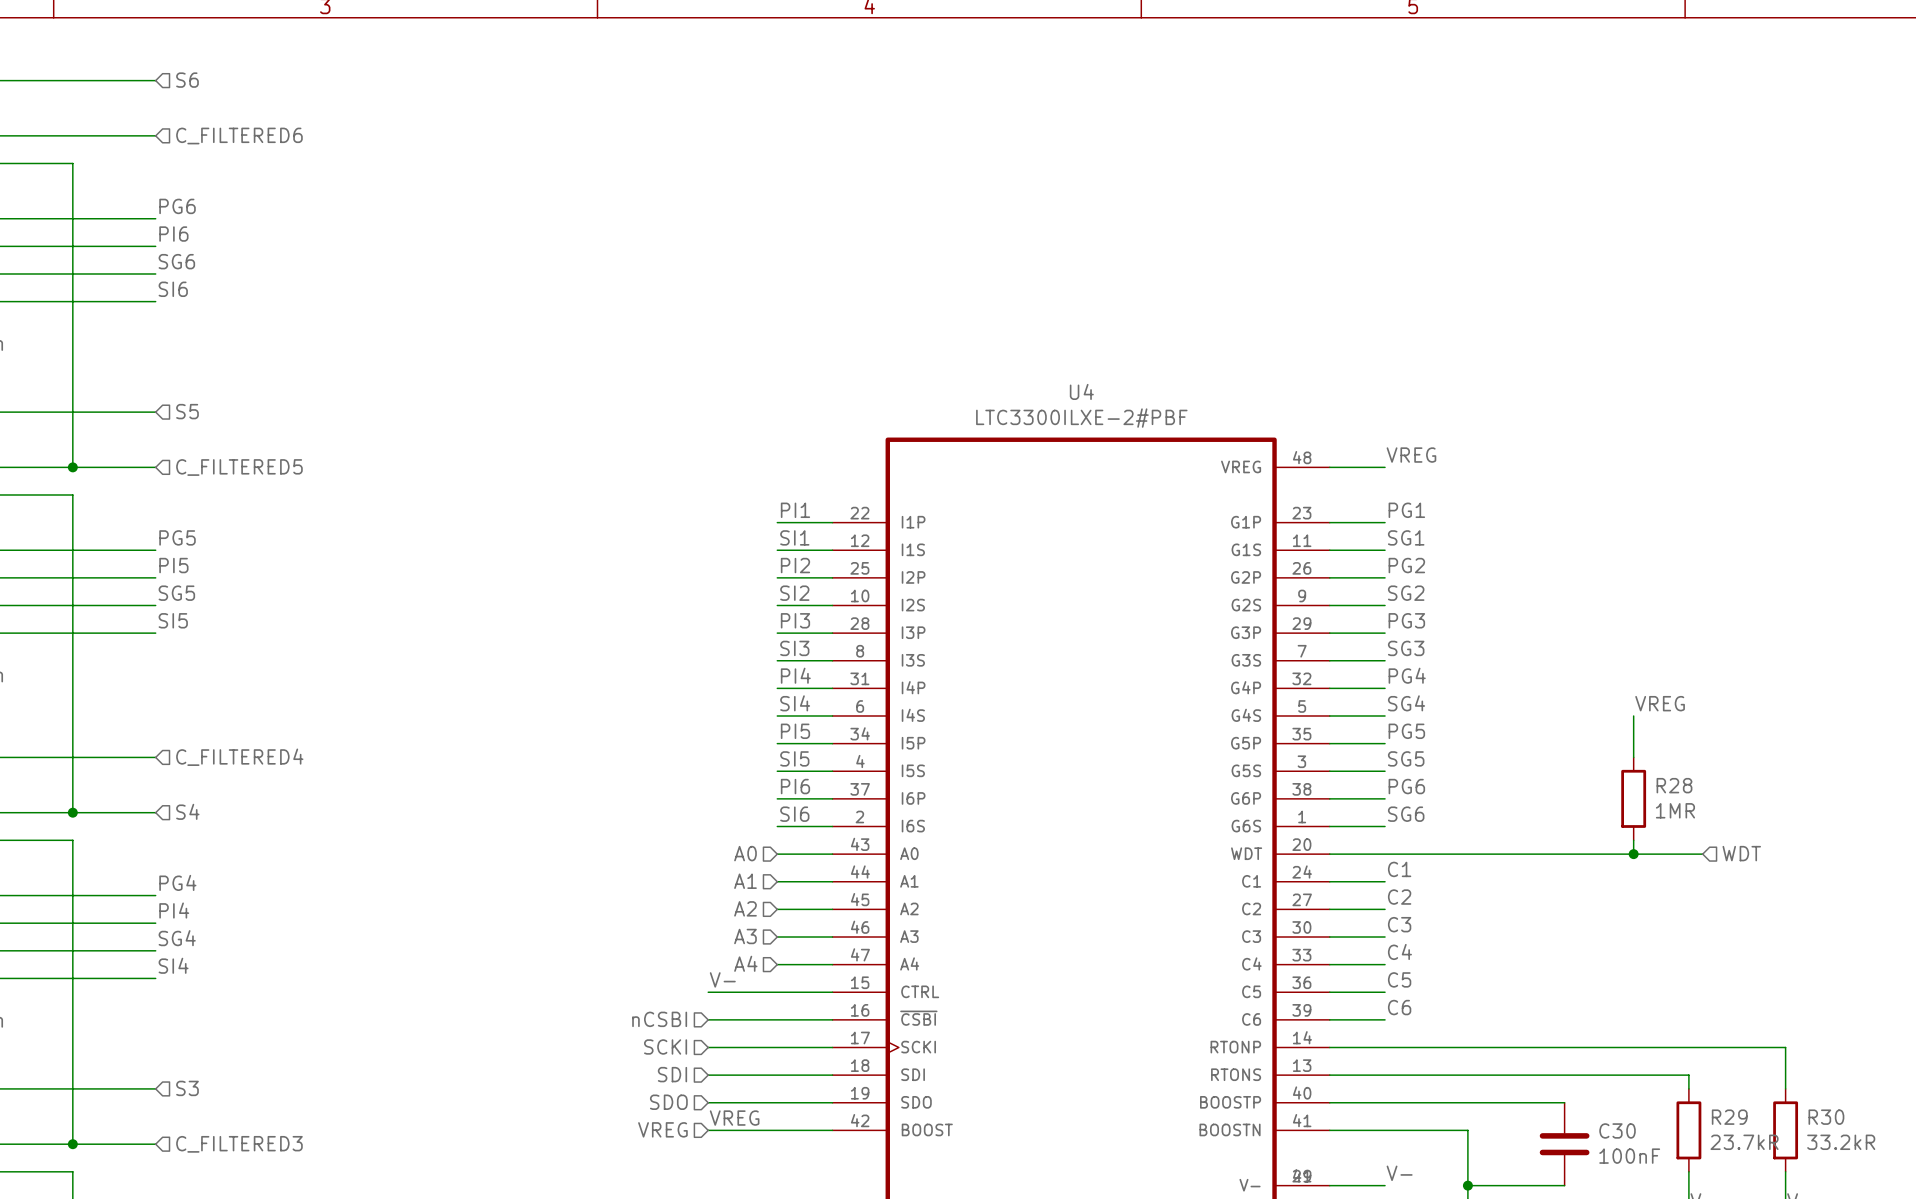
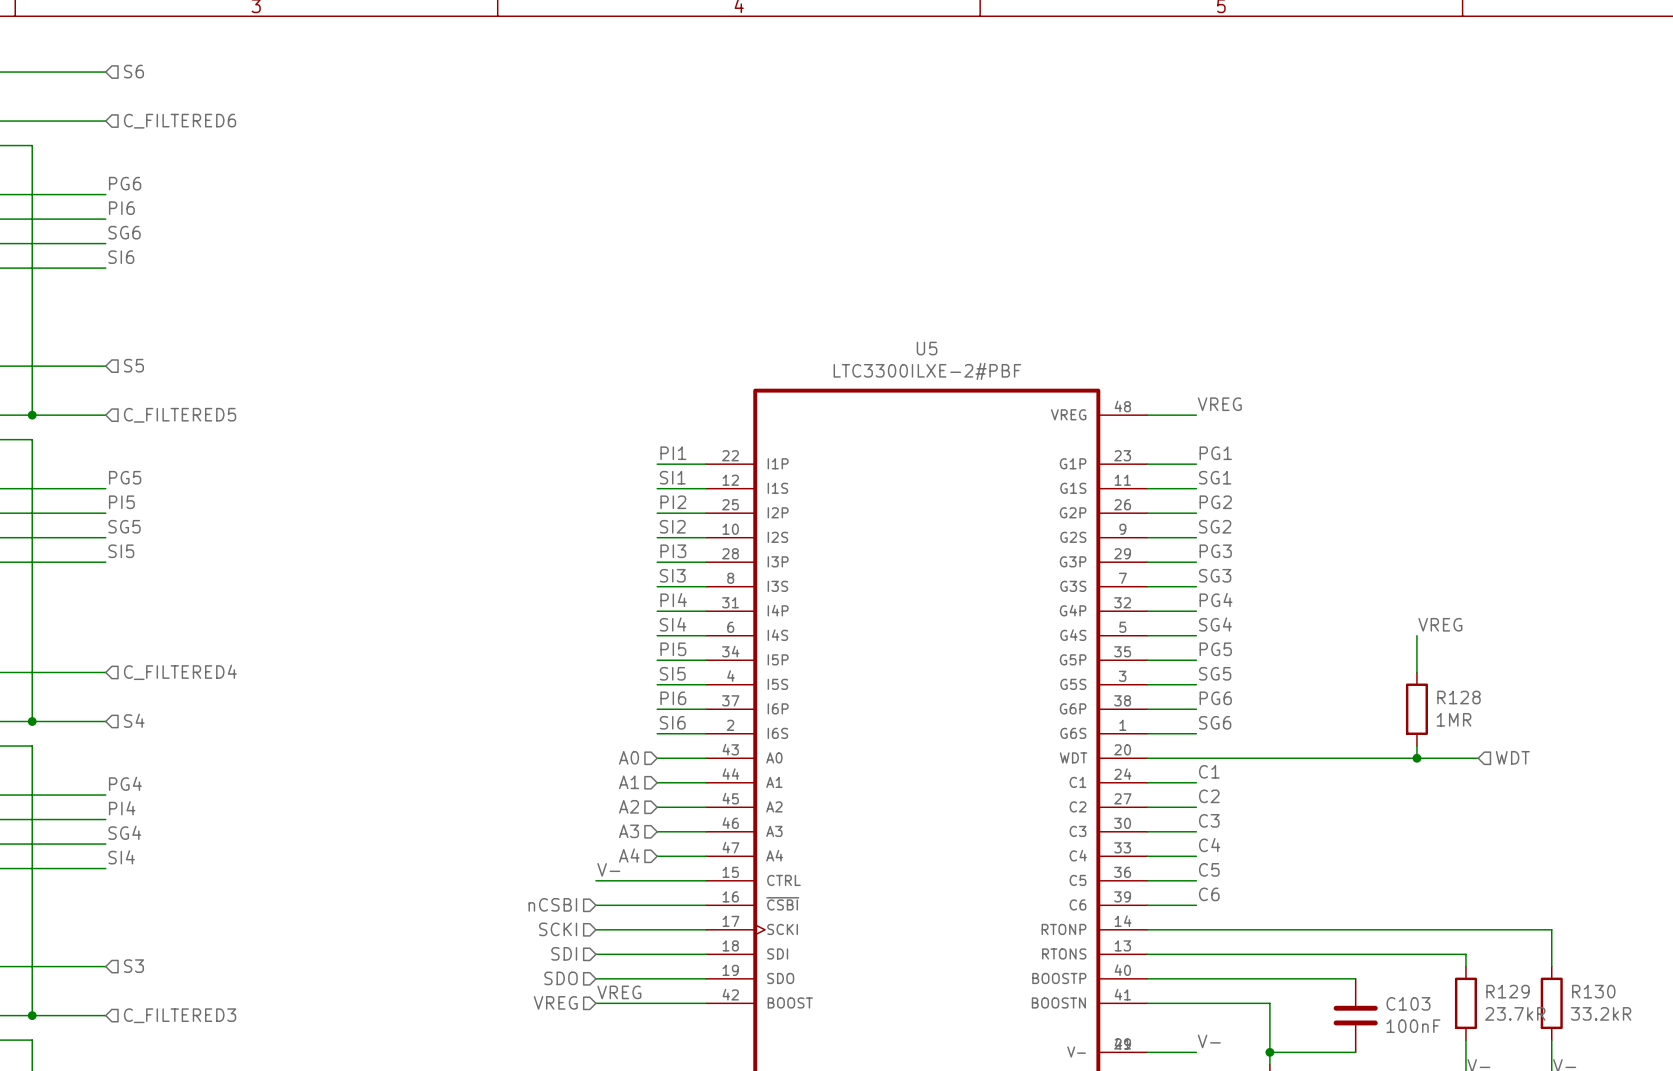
U4 name: U4 (1081, 391) -> U5 (927, 348)
R28 name: R28 (1674, 785) -> R128 (1458, 697)
R29 name: R29 (1729, 1117) -> R129 (1508, 991)
R30 name: R30 (1826, 1117) -> R130 (1593, 991)
C30 name: C30 (1617, 1130) -> C103 (1408, 1003)

